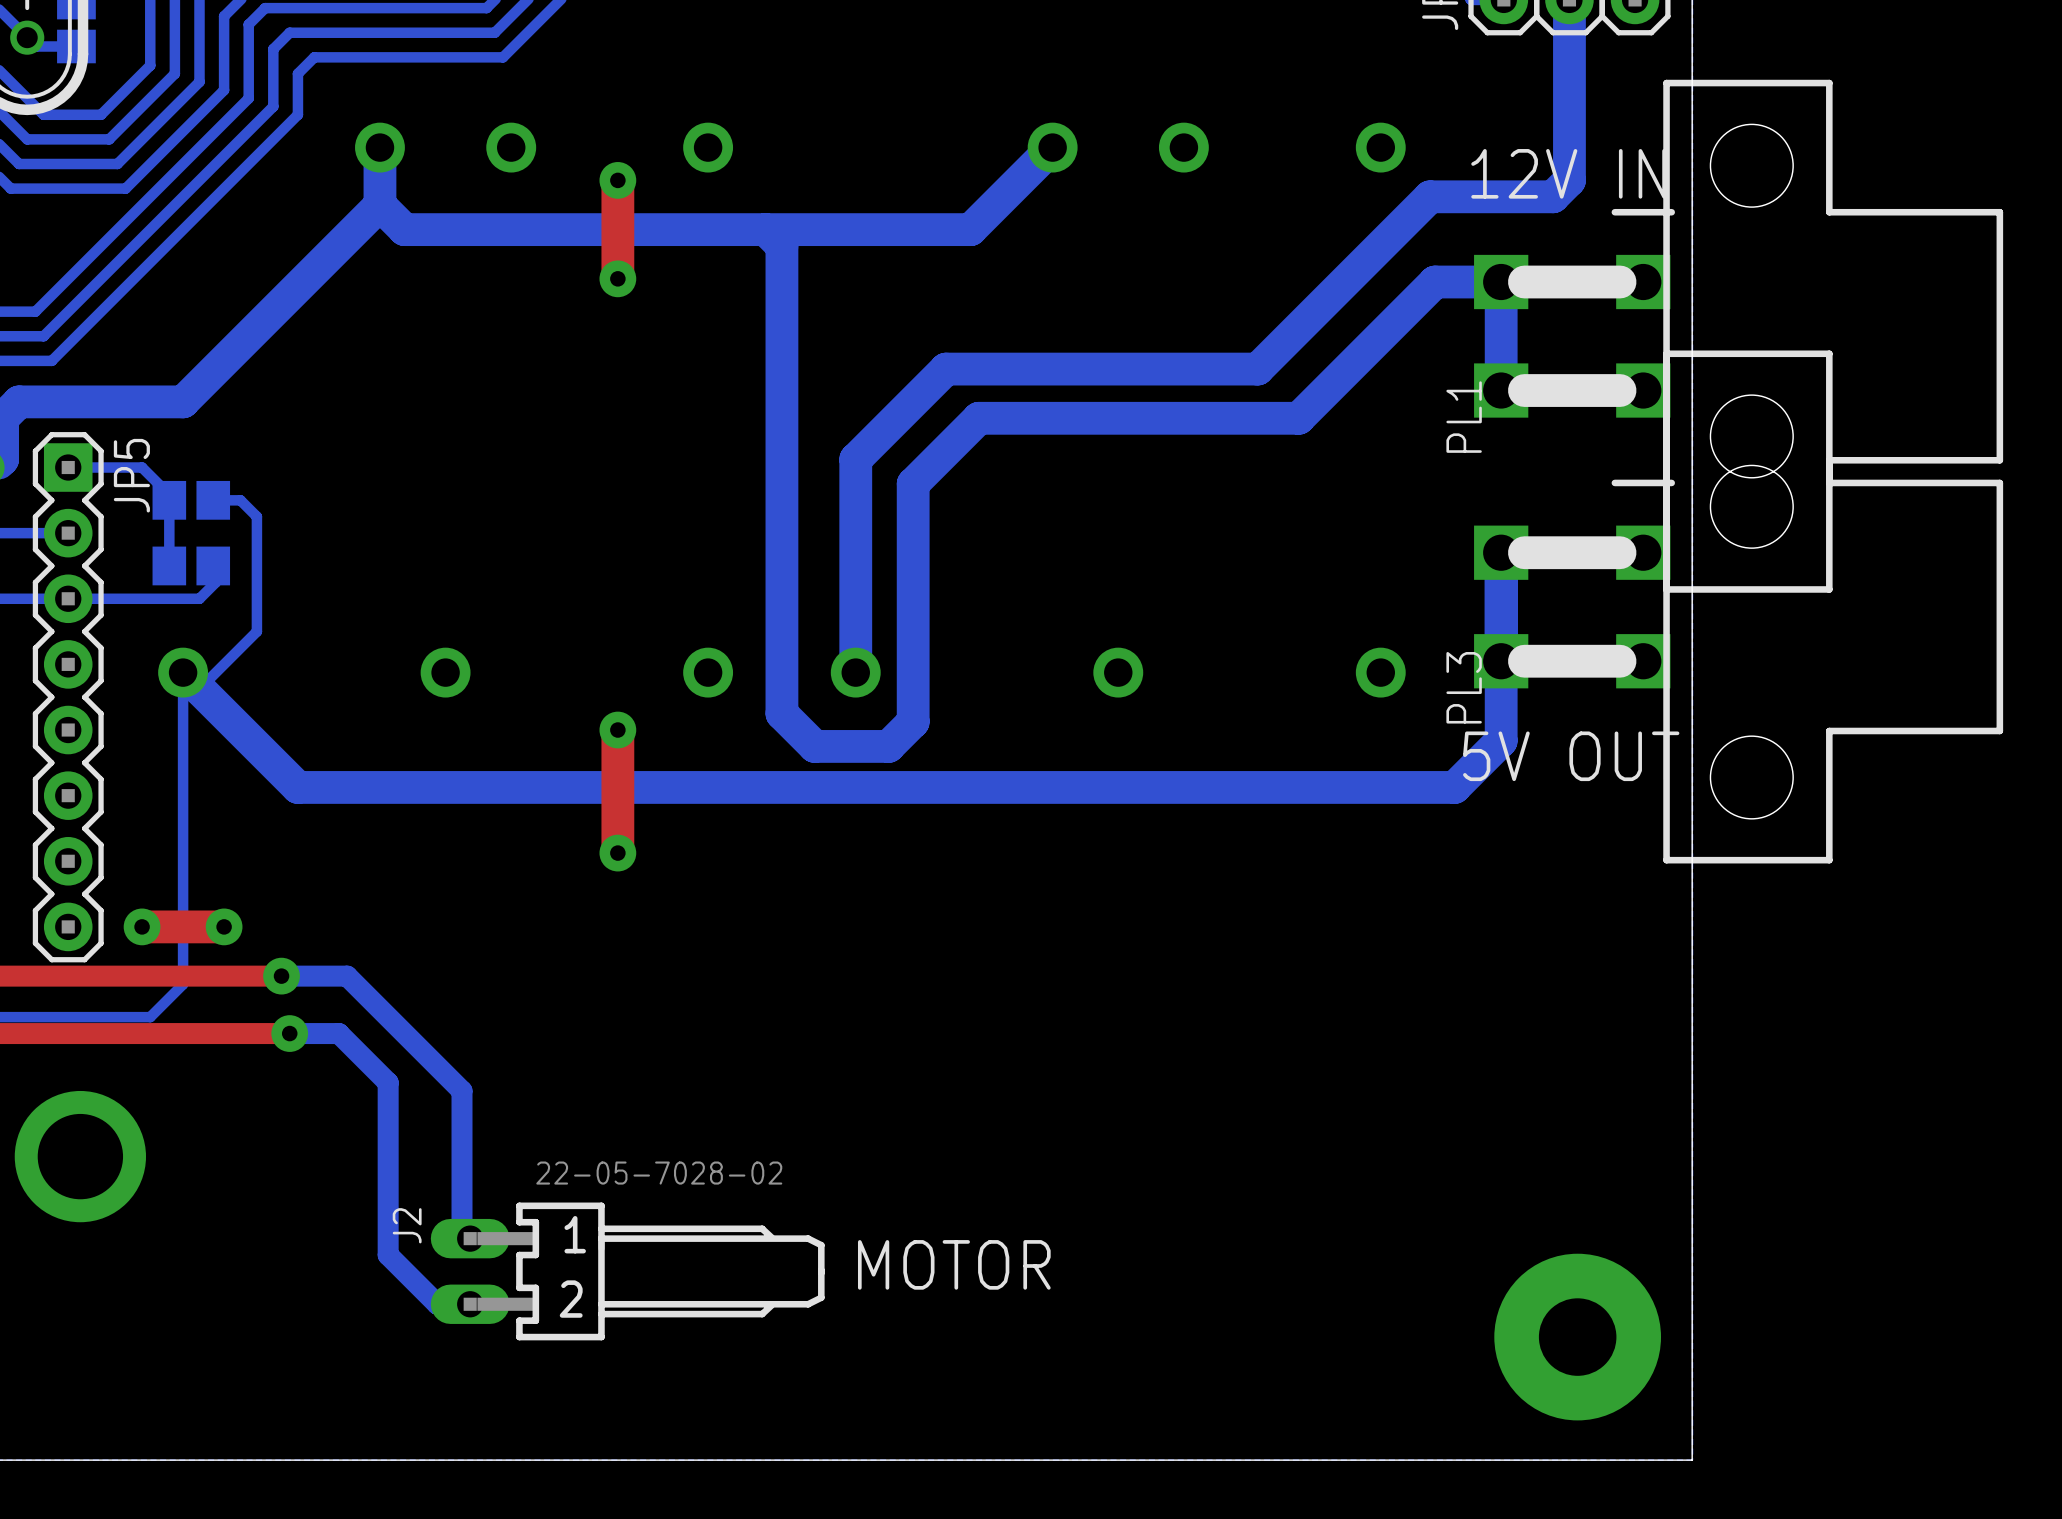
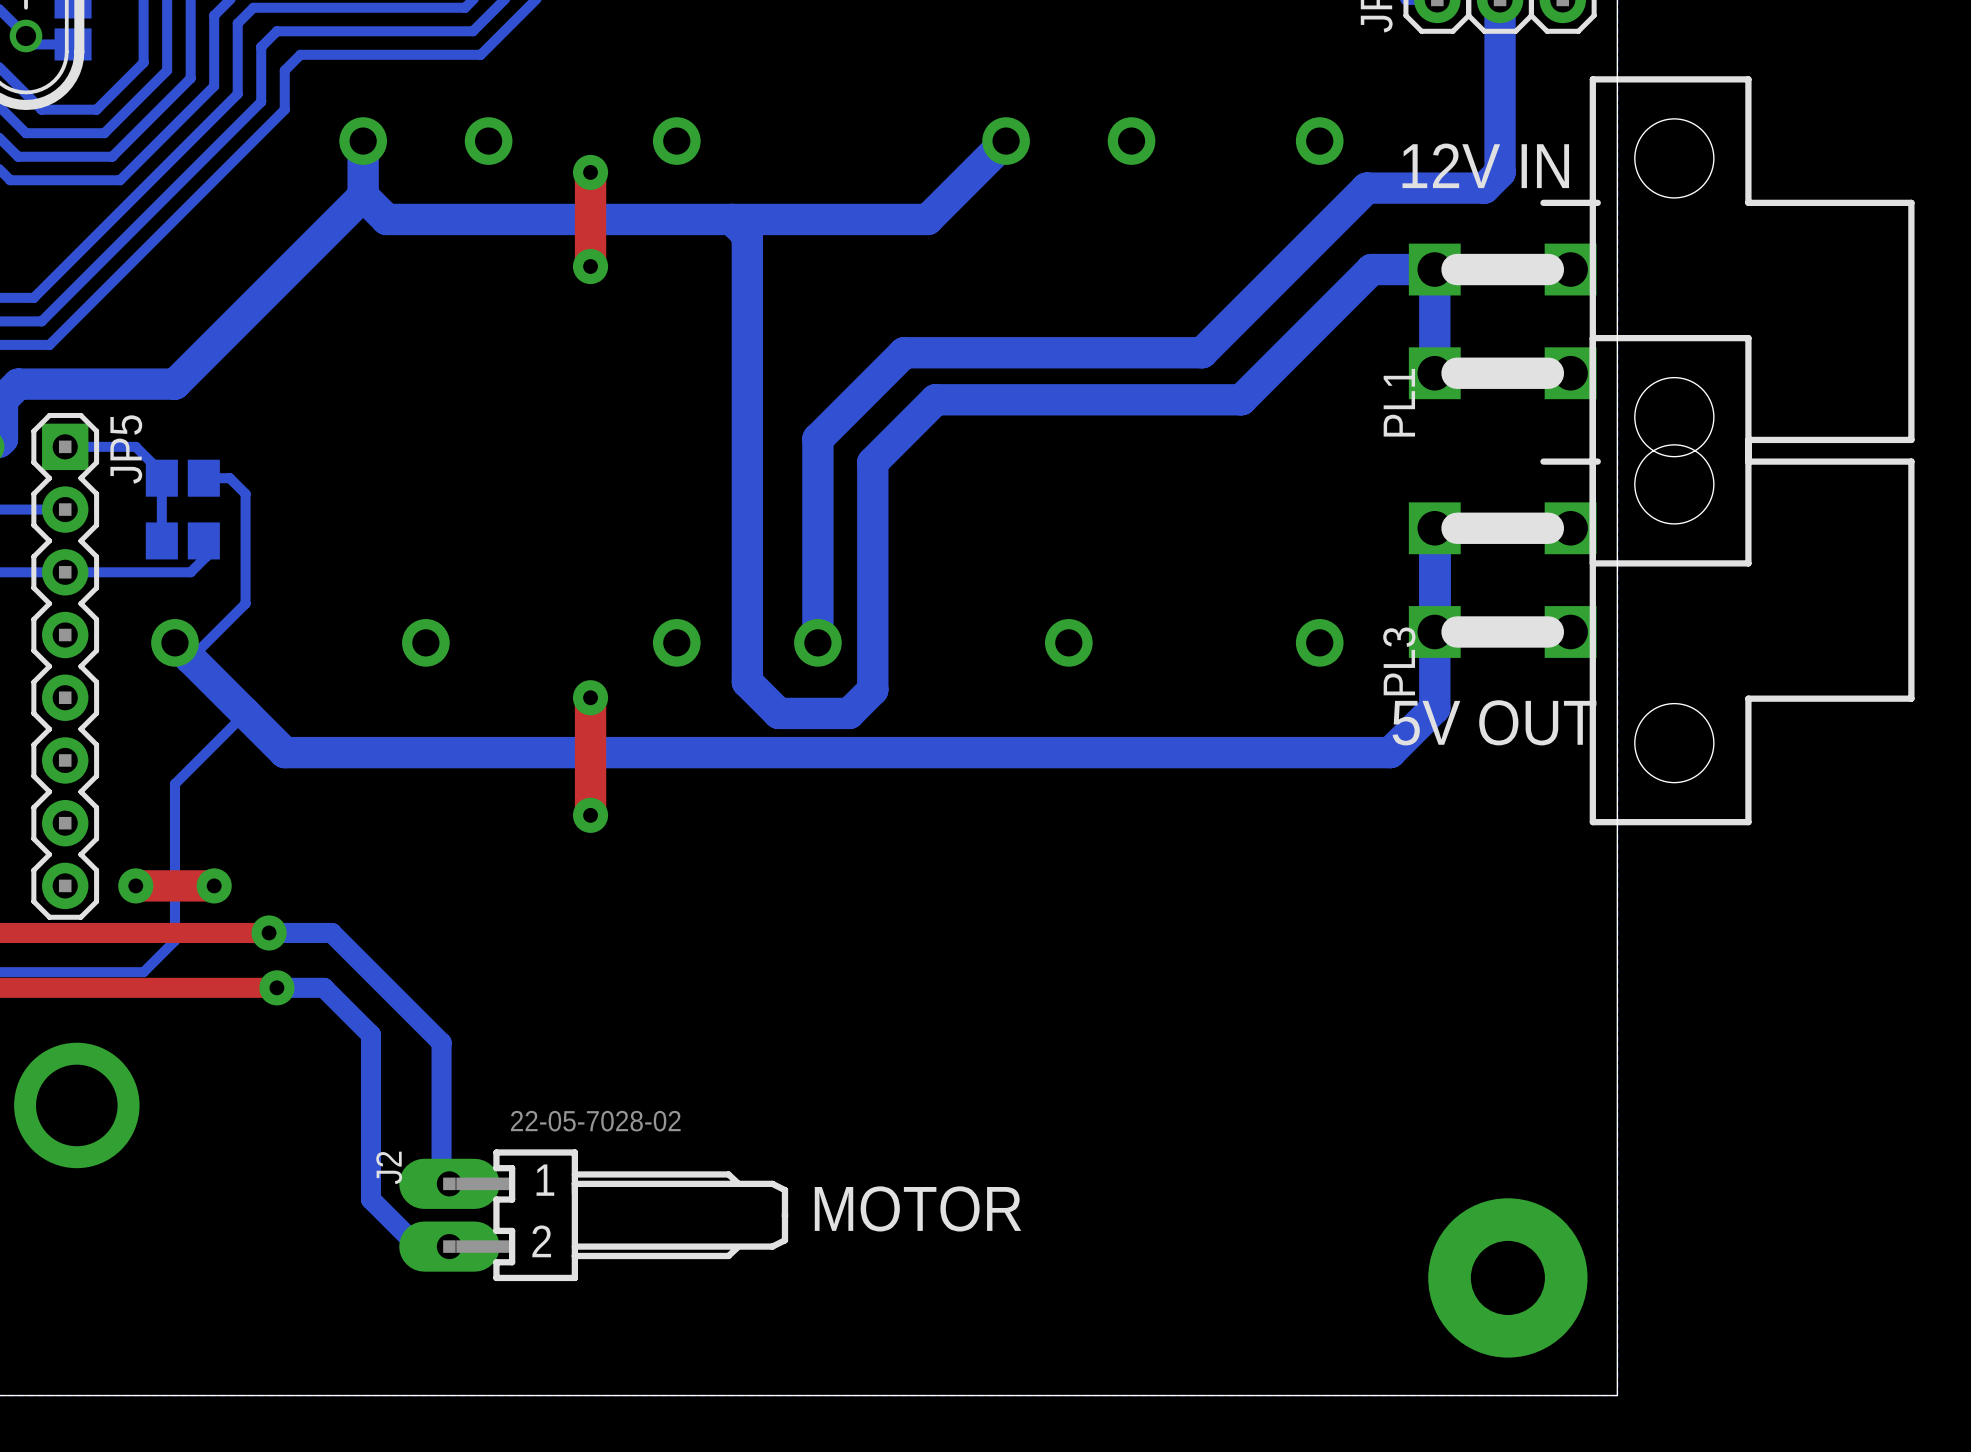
bottom track: (183, 672) (183, 820) -> (245, 713) (174, 783)
J2 footprint: [430, 1202, 825, 1341] -> [399, 1149, 789, 1282]

